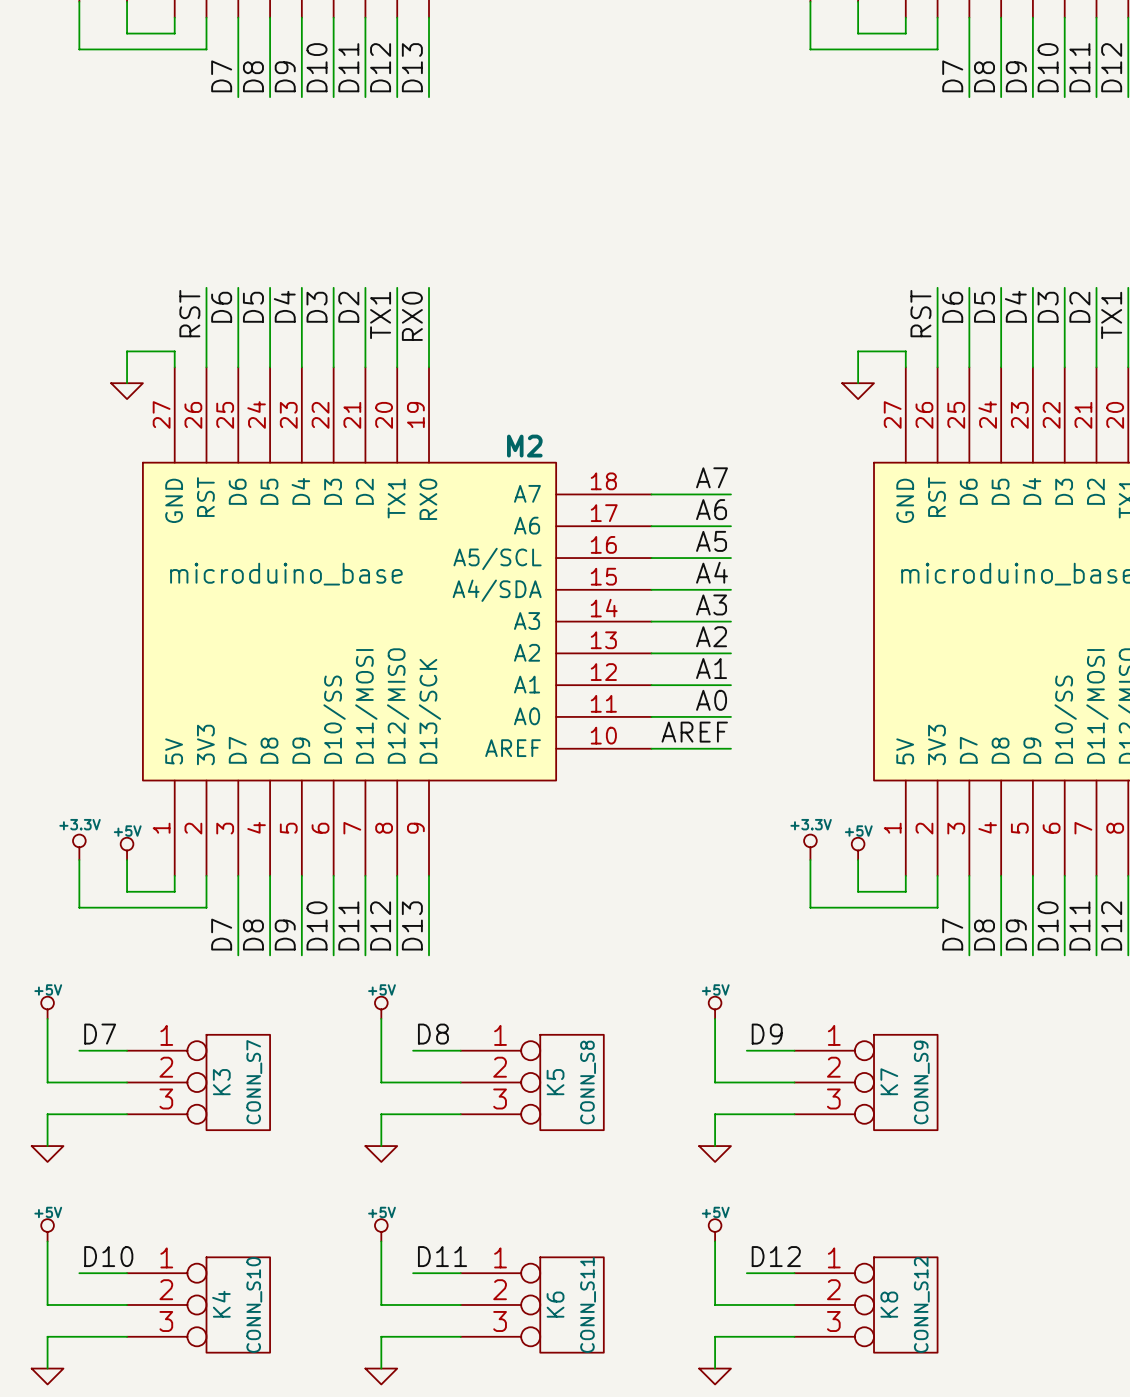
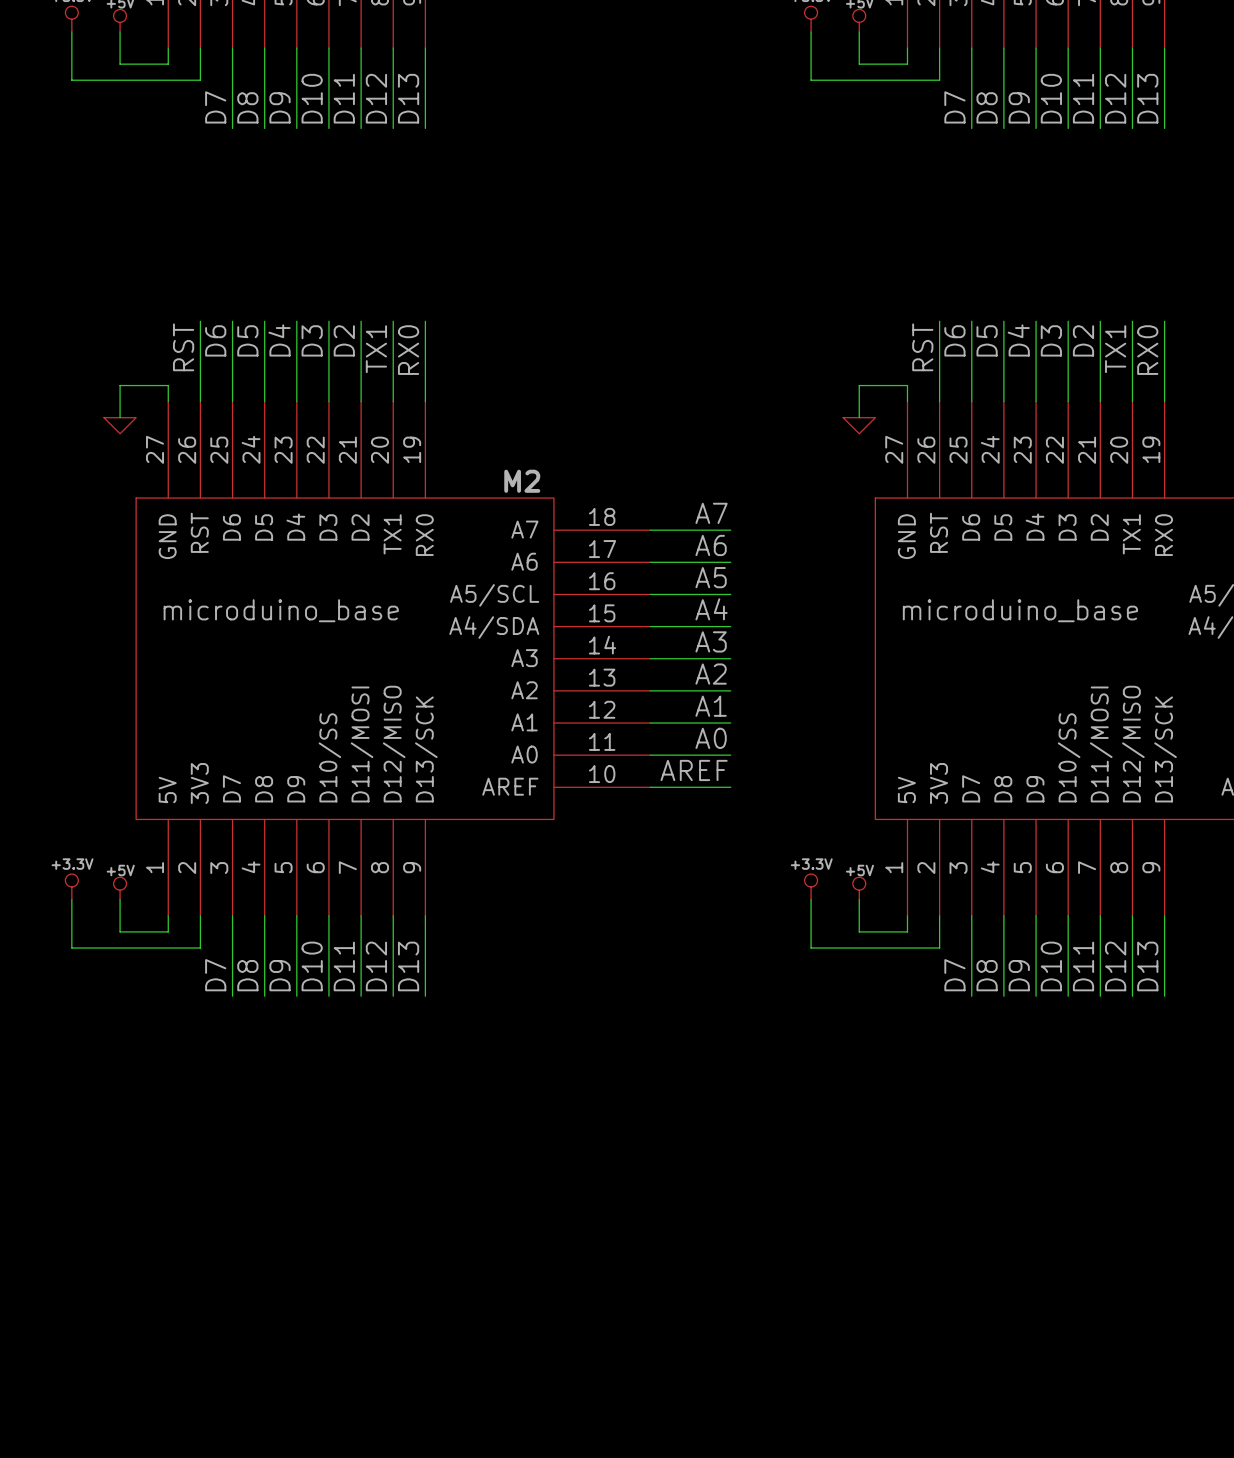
power symbol: +5V (47, 1007) -> none
power symbol: +5V (381, 1007) -> none
power symbol: +5V (715, 1007) -> none
wire: (47, 1018) (47, 1082) (127, 1082) -> none
wire: (381, 1018) (381, 1082) (460, 1082) -> none
wire: (715, 1018) (715, 1082) (794, 1082) -> none
label: D7 (100, 1034) -> none
label: D8 (433, 1034) -> none
label: D9 (767, 1034) -> none
wire: (79, 1050) (127, 1050) -> none
wire: (413, 1050) (460, 1050) -> none
wire: (746, 1050) (794, 1050) -> none
K3: CONN_S7 (198, 1082) -> none
K5: CONN_S8 (532, 1082) -> none
K7: CONN_S9 (866, 1082) -> none
wire: (127, 1114) (47, 1114) (47, 1146) -> none
wire: (460, 1114) (381, 1114) (381, 1146) -> none
wire: (794, 1114) (715, 1114) (715, 1146) -> none
power symbol: (47, 1154) -> none
power symbol: (381, 1154) -> none
power symbol: (715, 1154) -> none
power symbol: +5V (47, 1230) -> none
power symbol: +5V (381, 1230) -> none
power symbol: +5V (715, 1230) -> none
wire: (47, 1241) (47, 1304) (127, 1304) -> none
wire: (381, 1241) (381, 1304) (460, 1304) -> none
wire: (715, 1241) (715, 1304) (794, 1304) -> none
label: D10 (108, 1256) -> none
label: D11 (442, 1256) -> none
label: D12 (776, 1256) -> none
wire: (79, 1273) (127, 1273) -> none
wire: (413, 1273) (460, 1273) -> none
wire: (746, 1273) (794, 1273) -> none
K4: CONN_S10 (198, 1304) -> none
K6: CONN_S11 (532, 1304) -> none
K8: CONN_S12 (866, 1304) -> none
wire: (127, 1336) (47, 1336) (47, 1368) -> none
wire: (460, 1336) (381, 1336) (381, 1368) -> none
wire: (794, 1336) (715, 1336) (715, 1368) -> none
power symbol: (47, 1376) -> none
power symbol: (381, 1376) -> none
power symbol: (715, 1376) -> none

